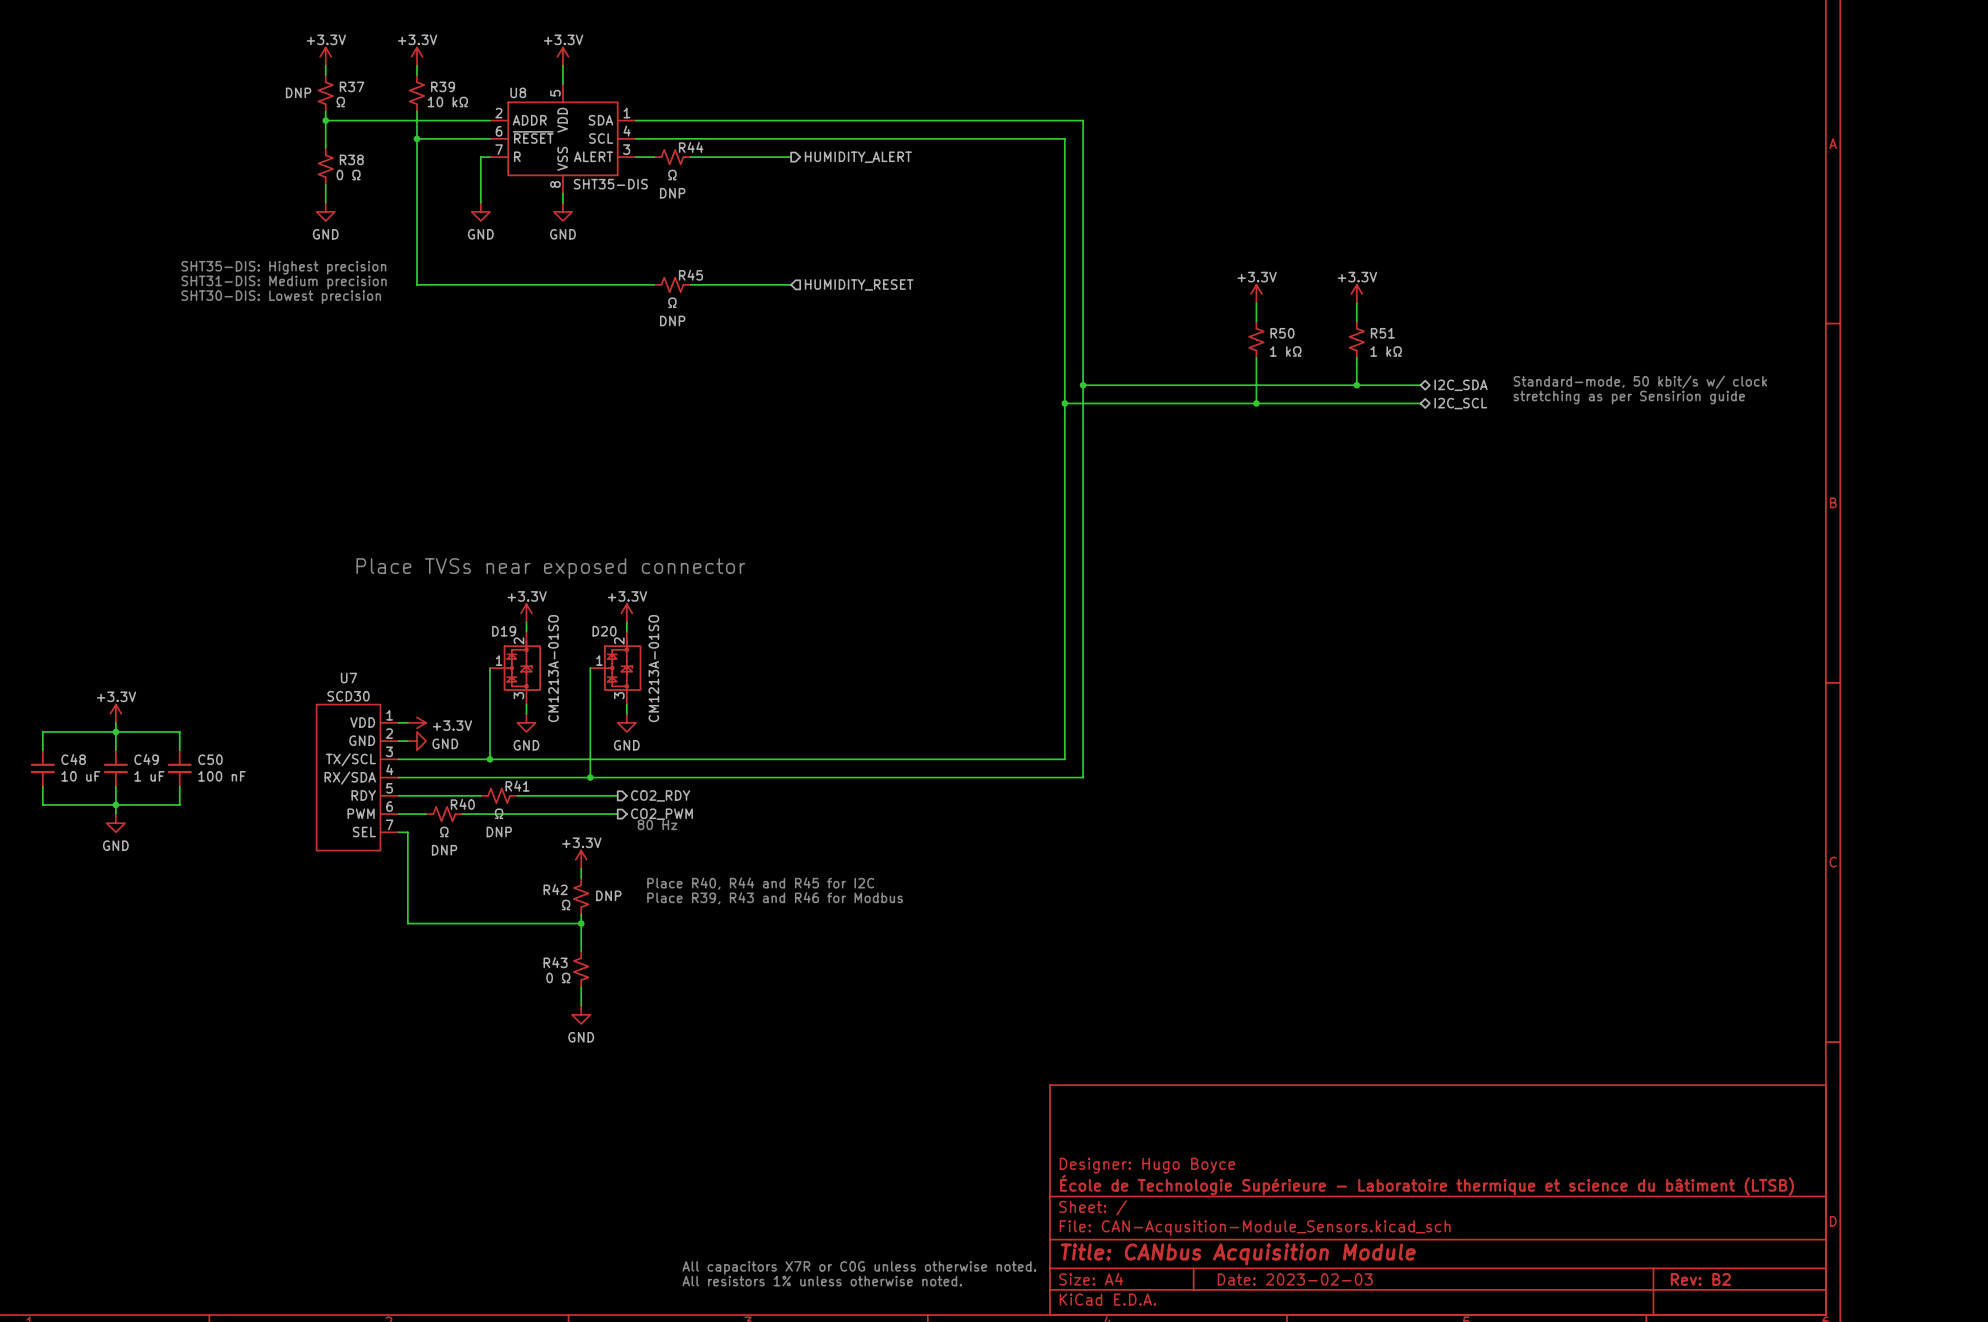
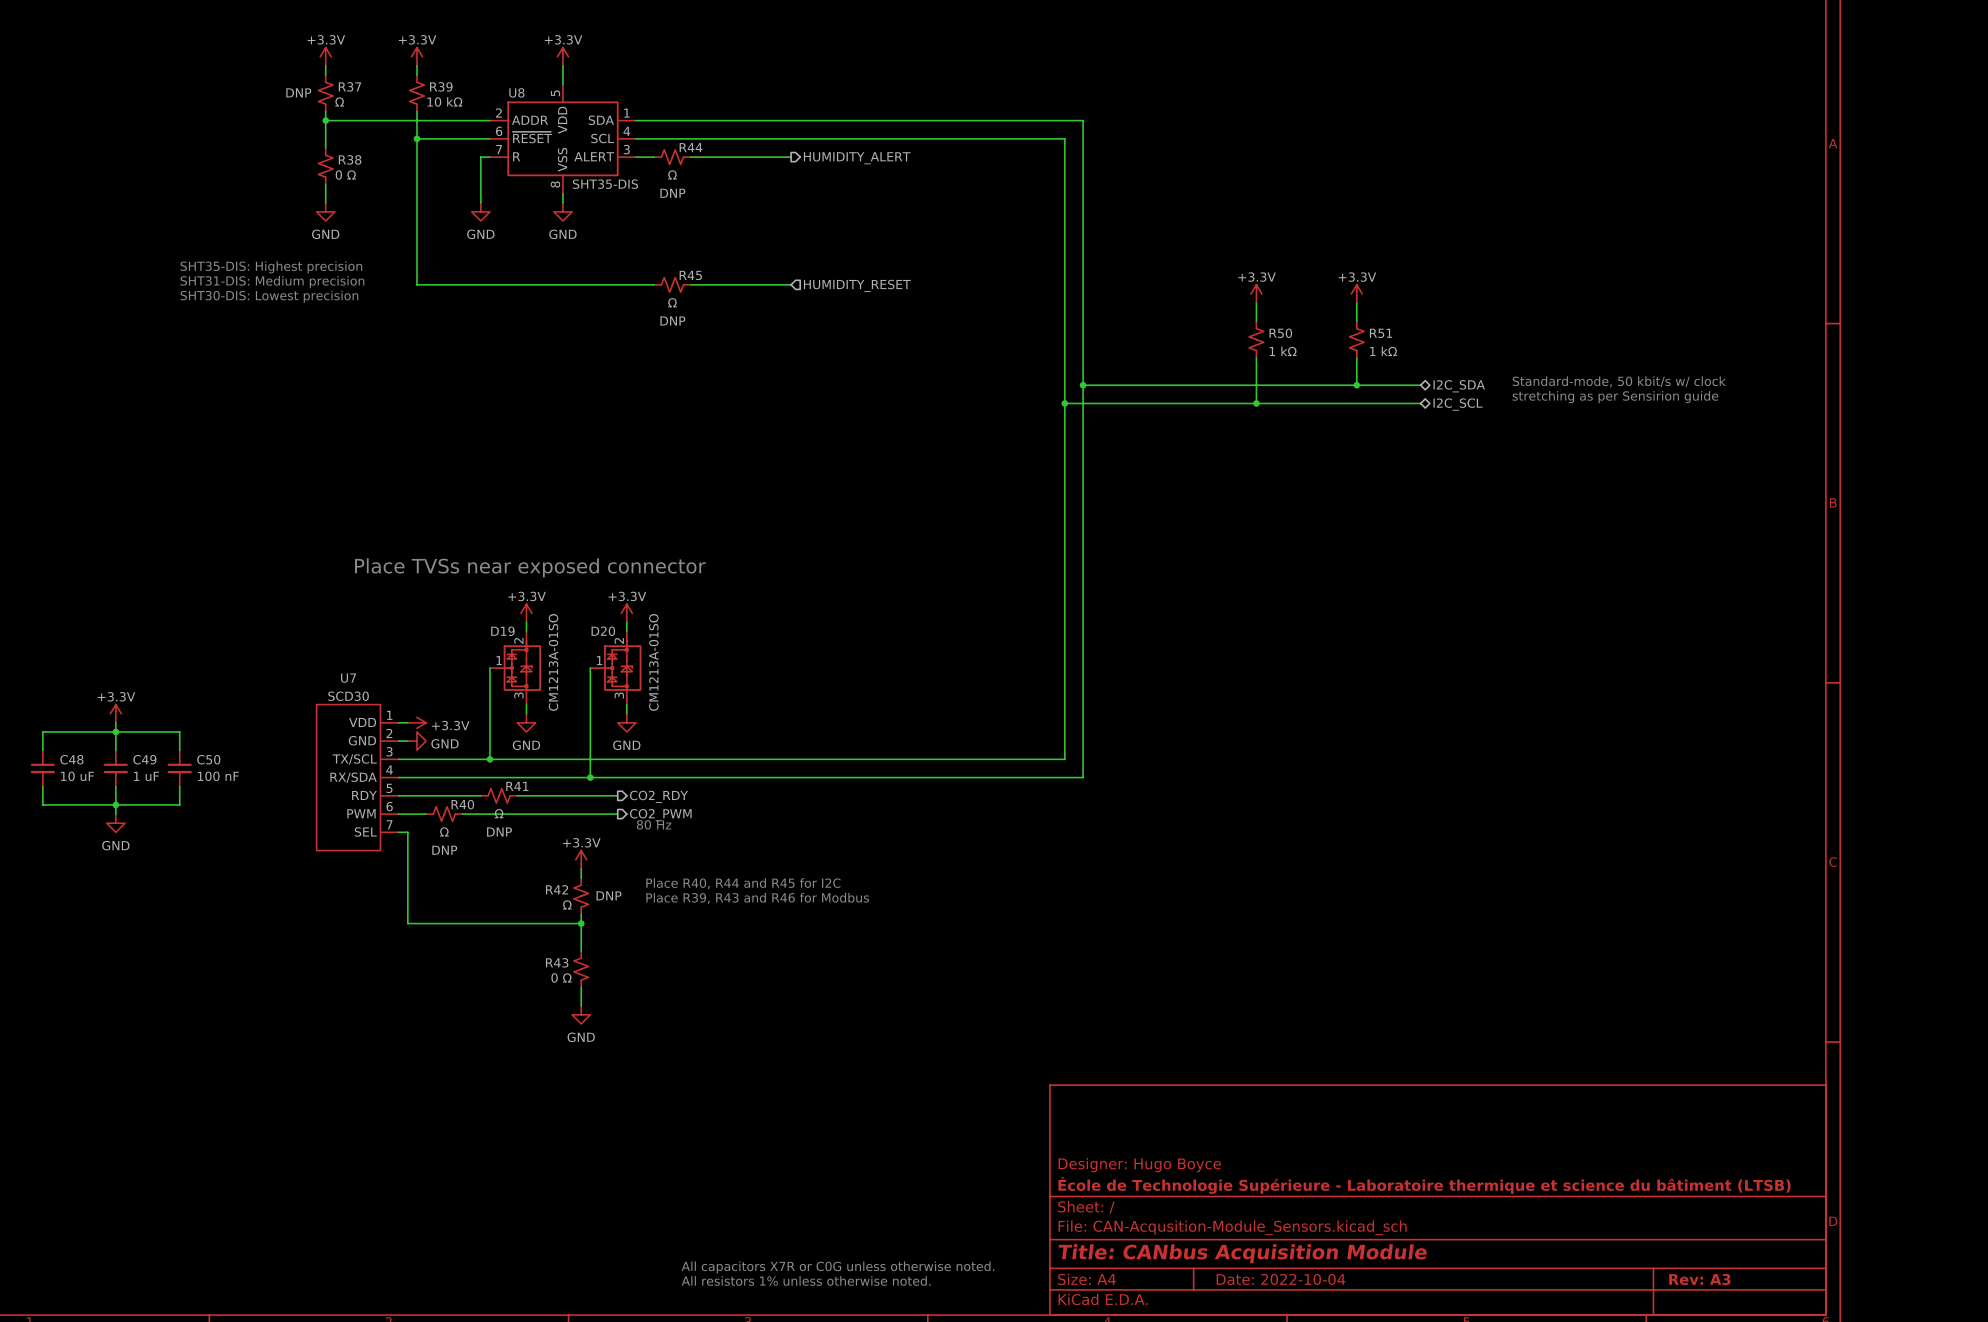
title block: Date: 2023-02-03 (1295, 1279) -> Date: 2022-10-04 (1280, 1279)
title block: Rev: B2 (1700, 1279) -> Rev: A3 (1699, 1279)

